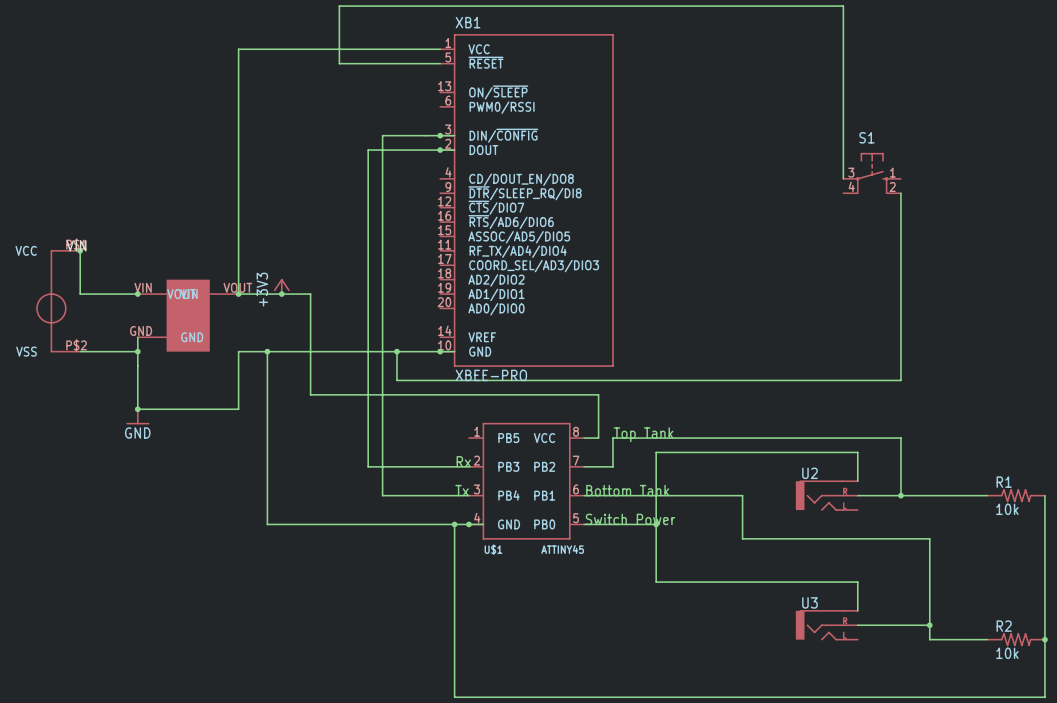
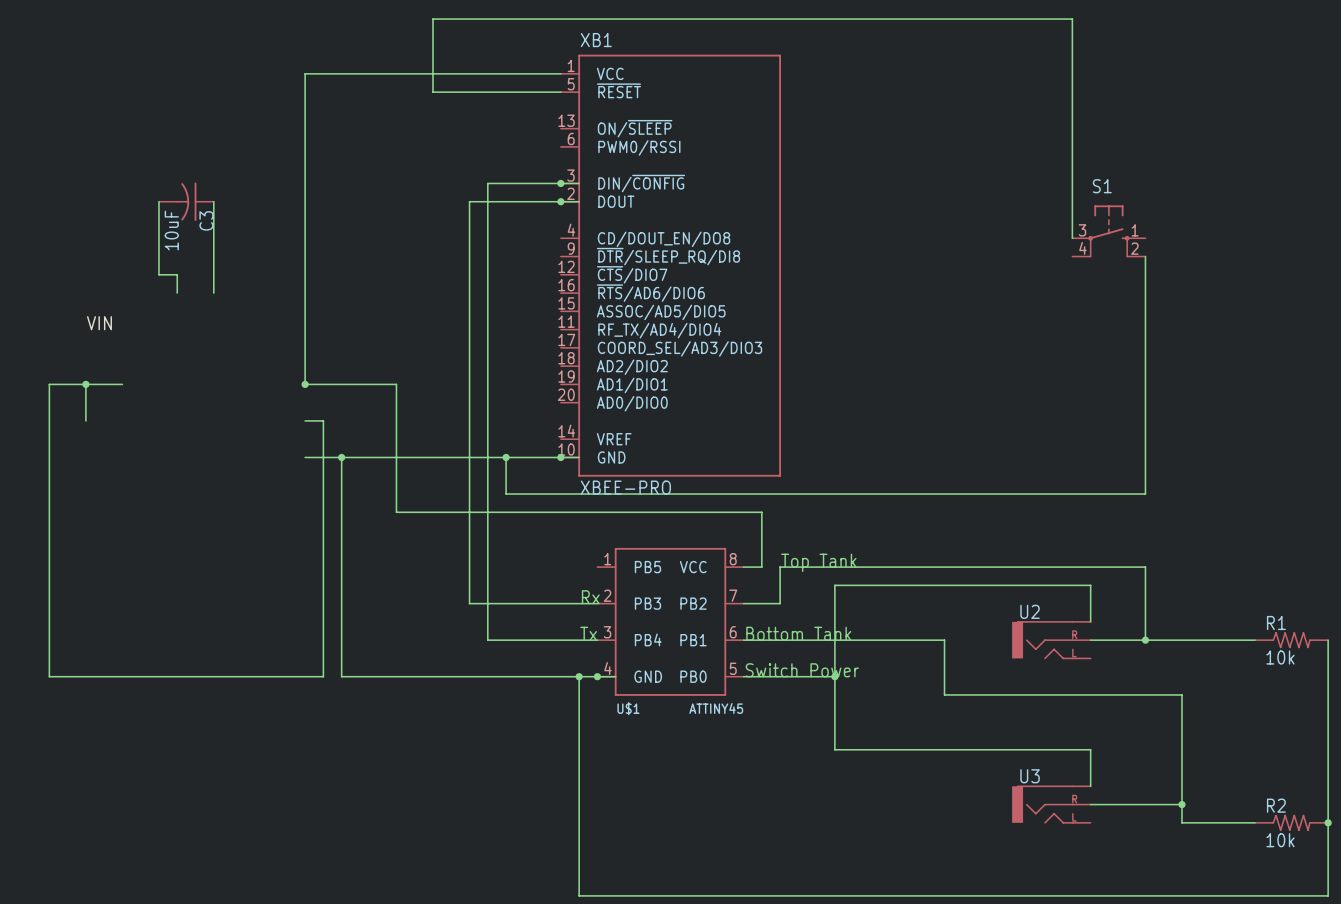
wire: none -> (158, 201) (158, 274) (177, 274) (177, 293)
C3: none -> 10uF (186, 201)
wire: none -> (213, 201) (213, 293)
wire: (80, 250) (80, 294) -> (305, 420) (323, 420) (323, 676) (49, 676) (49, 384) (104, 384)
junction: (80, 250) -> none
power symbol: +3V3 (281, 286) -> none
wire: none -> (85, 384) (85, 420)
junction: none -> (85, 384)
wire: (94, 294) (137, 294) -> none
junction: (137, 294) -> none
junction: (281, 294) -> none
part: (58, 301) -> none
part: (188, 315) -> none
wire: (137, 337) (137, 409) (238, 409) (238, 351) -> none
wire: (80, 351) (137, 351) -> none
junction: (137, 351) -> none
junction: (137, 409) -> none
power symbol: GND (137, 416) -> none

